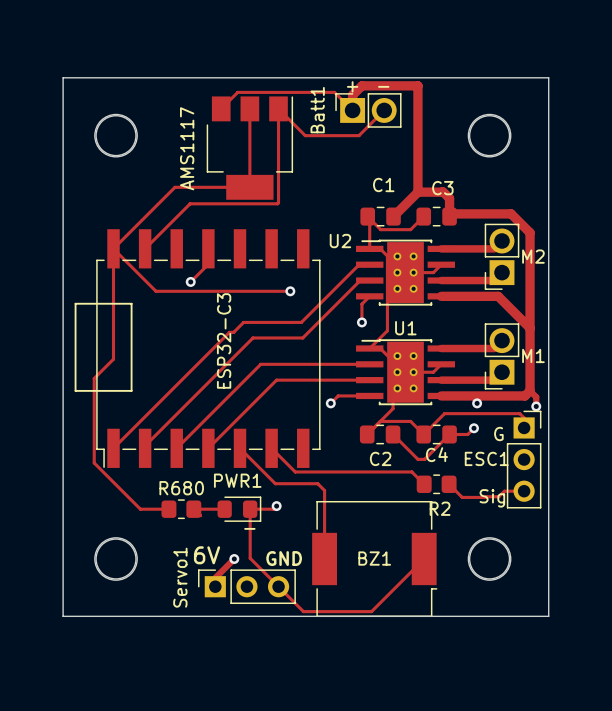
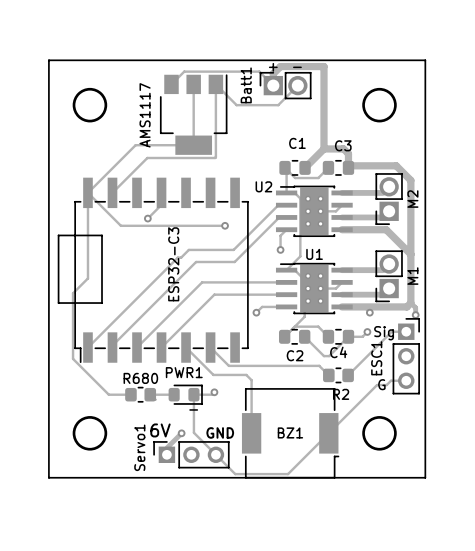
M2 name rotation: 0° (533, 256) -> 90° counterclockwise (412, 199)
M1 name rotation: 0° (533, 355) -> 90° counterclockwise (412, 276)
track: (524, 427) (524, 418) (519, 413) (444, 413) (423, 434) -> (406, 331) (391, 331) (348, 375)
text: G (498, 434) -> Sig (384, 333)
ESC1 name rotation: 0° (486, 458) -> 90° counterclockwise (376, 358)
track: (449, 484) (462, 497) (485, 497) -> (328, 433) (376, 385)
text: Sig (492, 498) -> G (381, 384)

